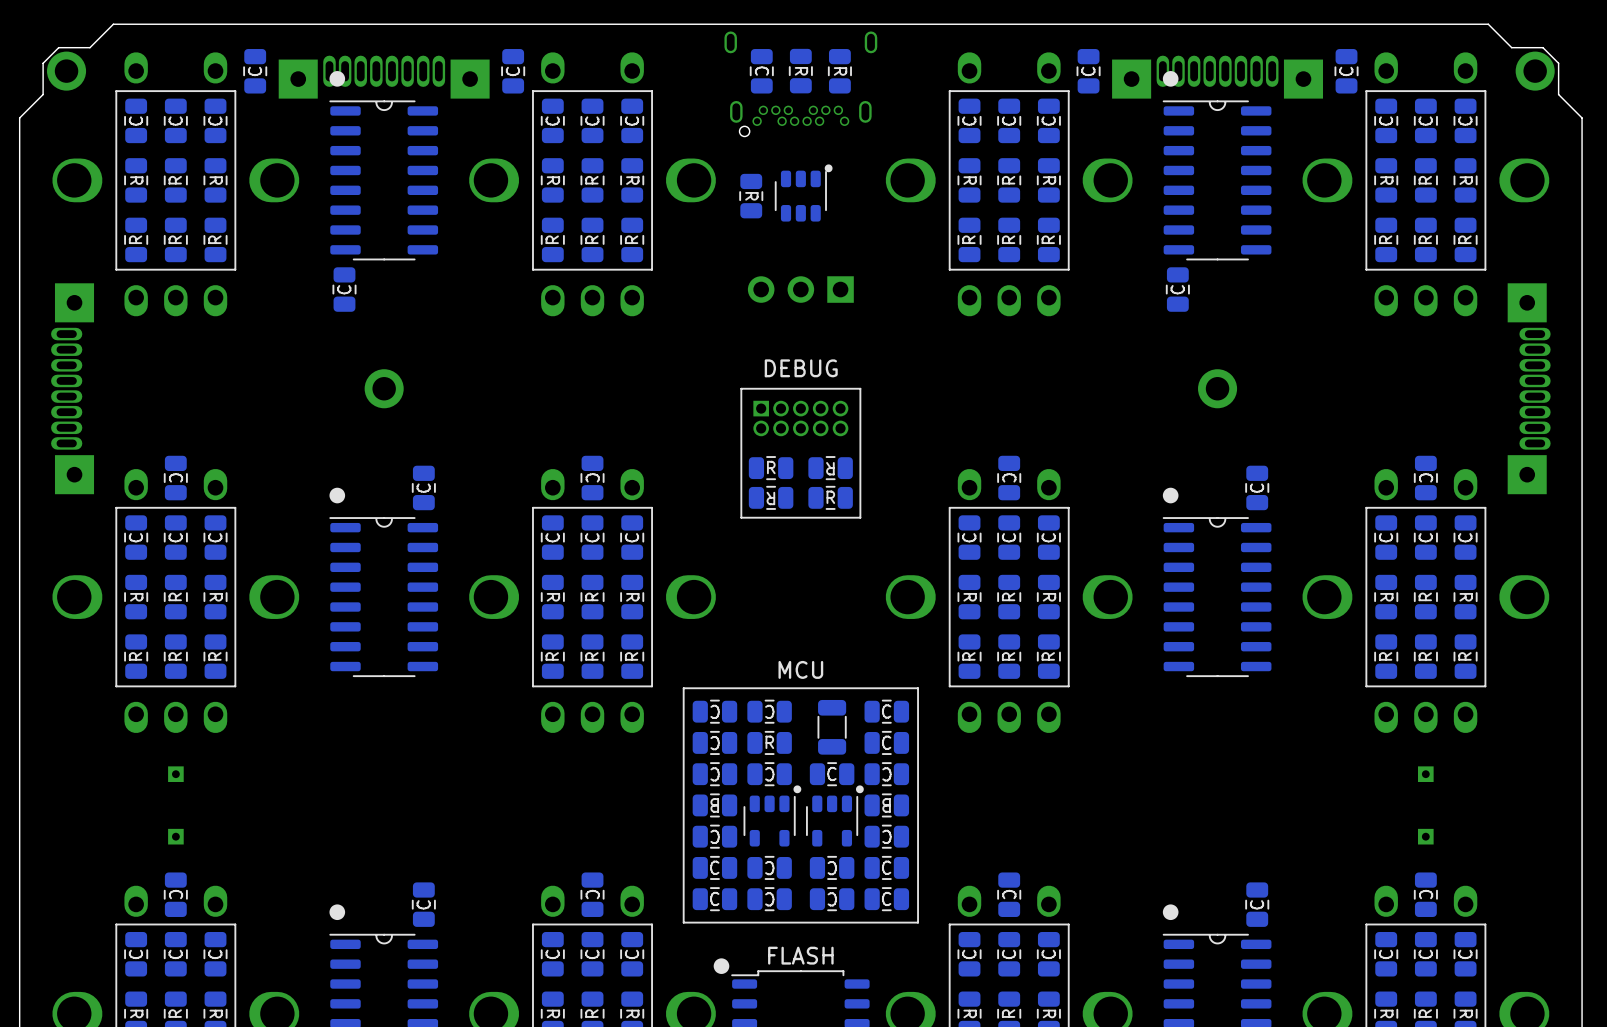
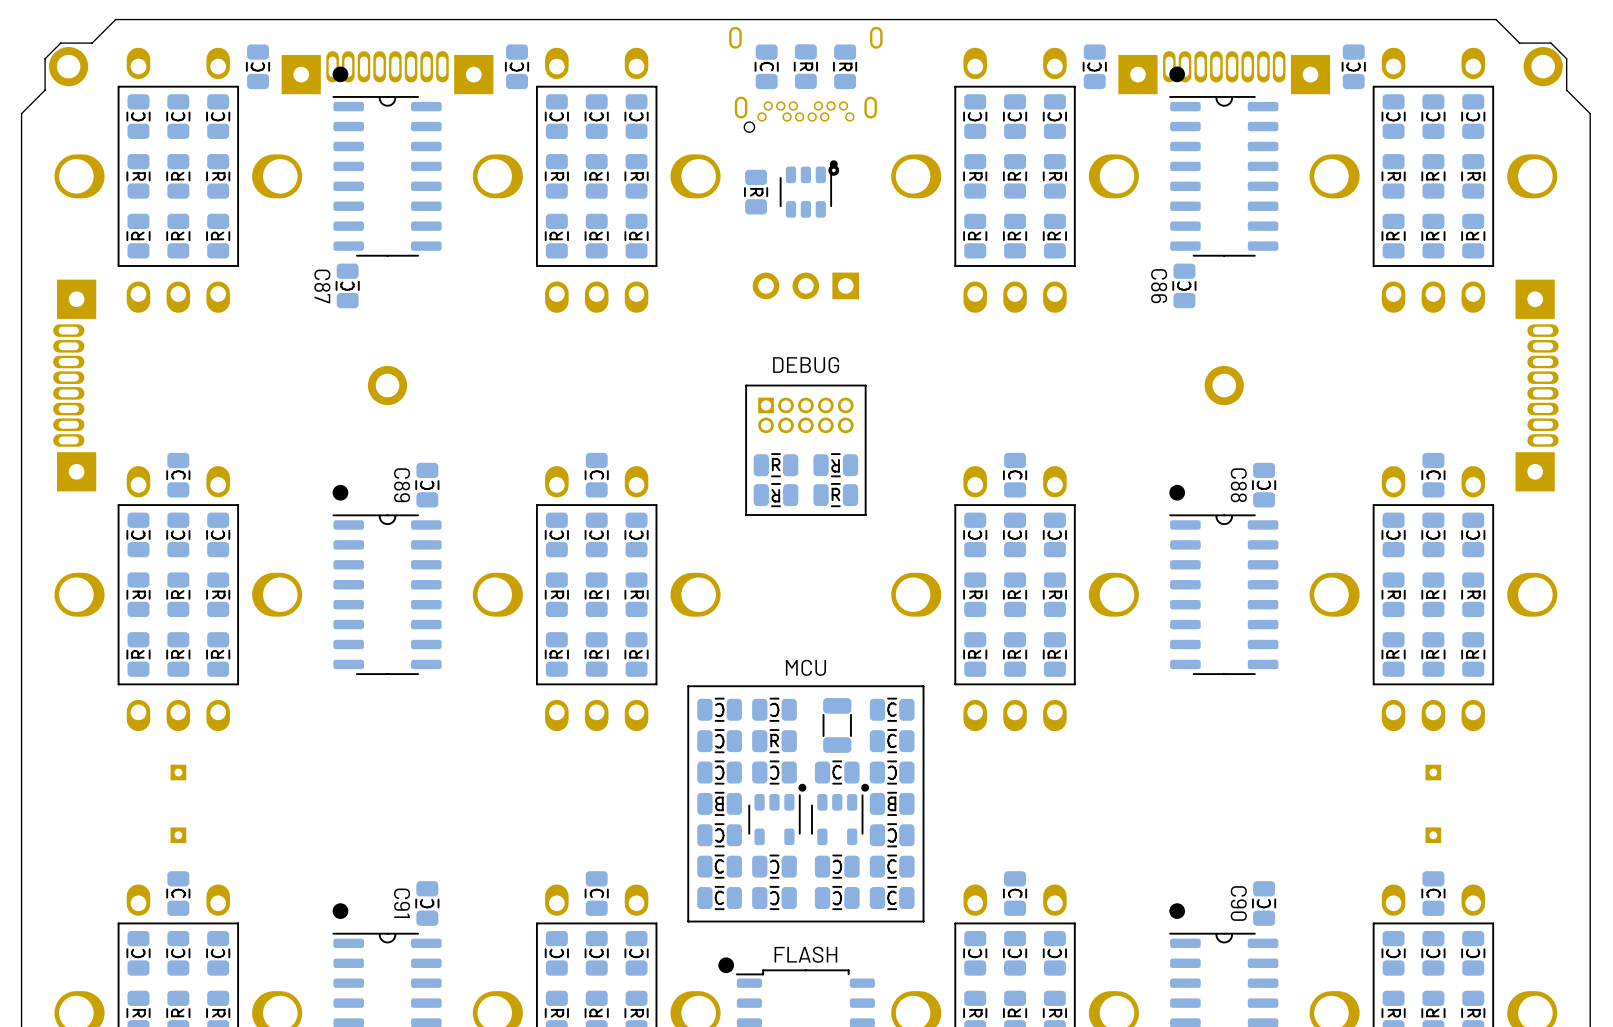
drawing: none -> [828, 164, 840, 176]
C87 name: none -> C87 (322, 286)
C86 name: none -> C86 (1159, 286)
C89 name: none -> C89 (402, 485)
C88 name: none -> C88 (1238, 485)
C91 name: none -> C91 (402, 903)
C90 name: none -> C90 (1238, 903)

